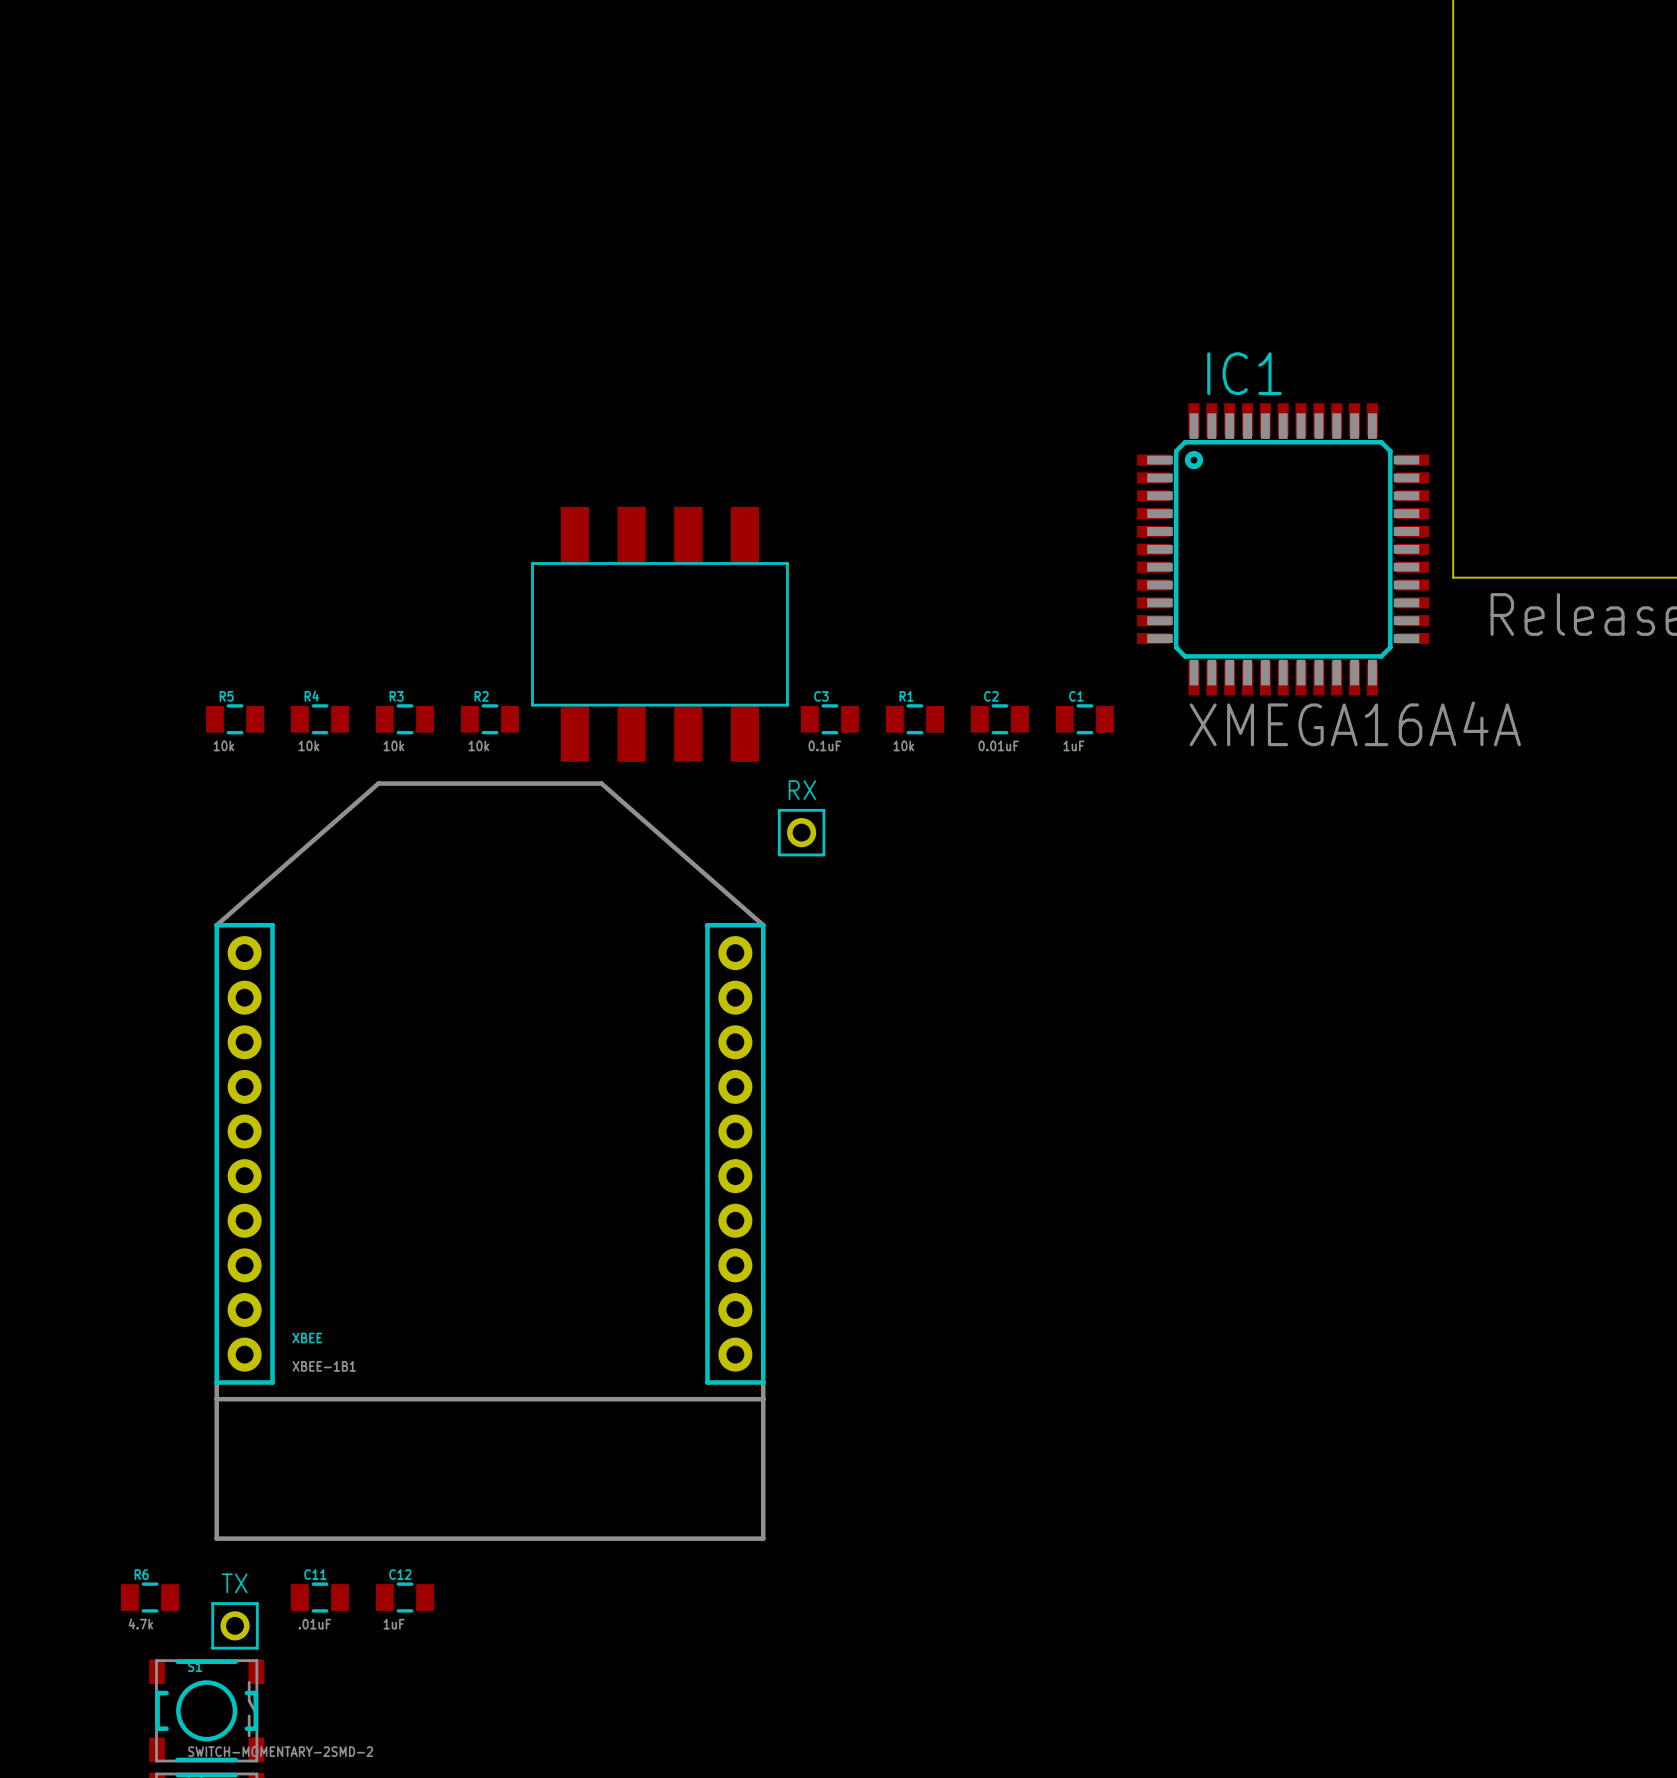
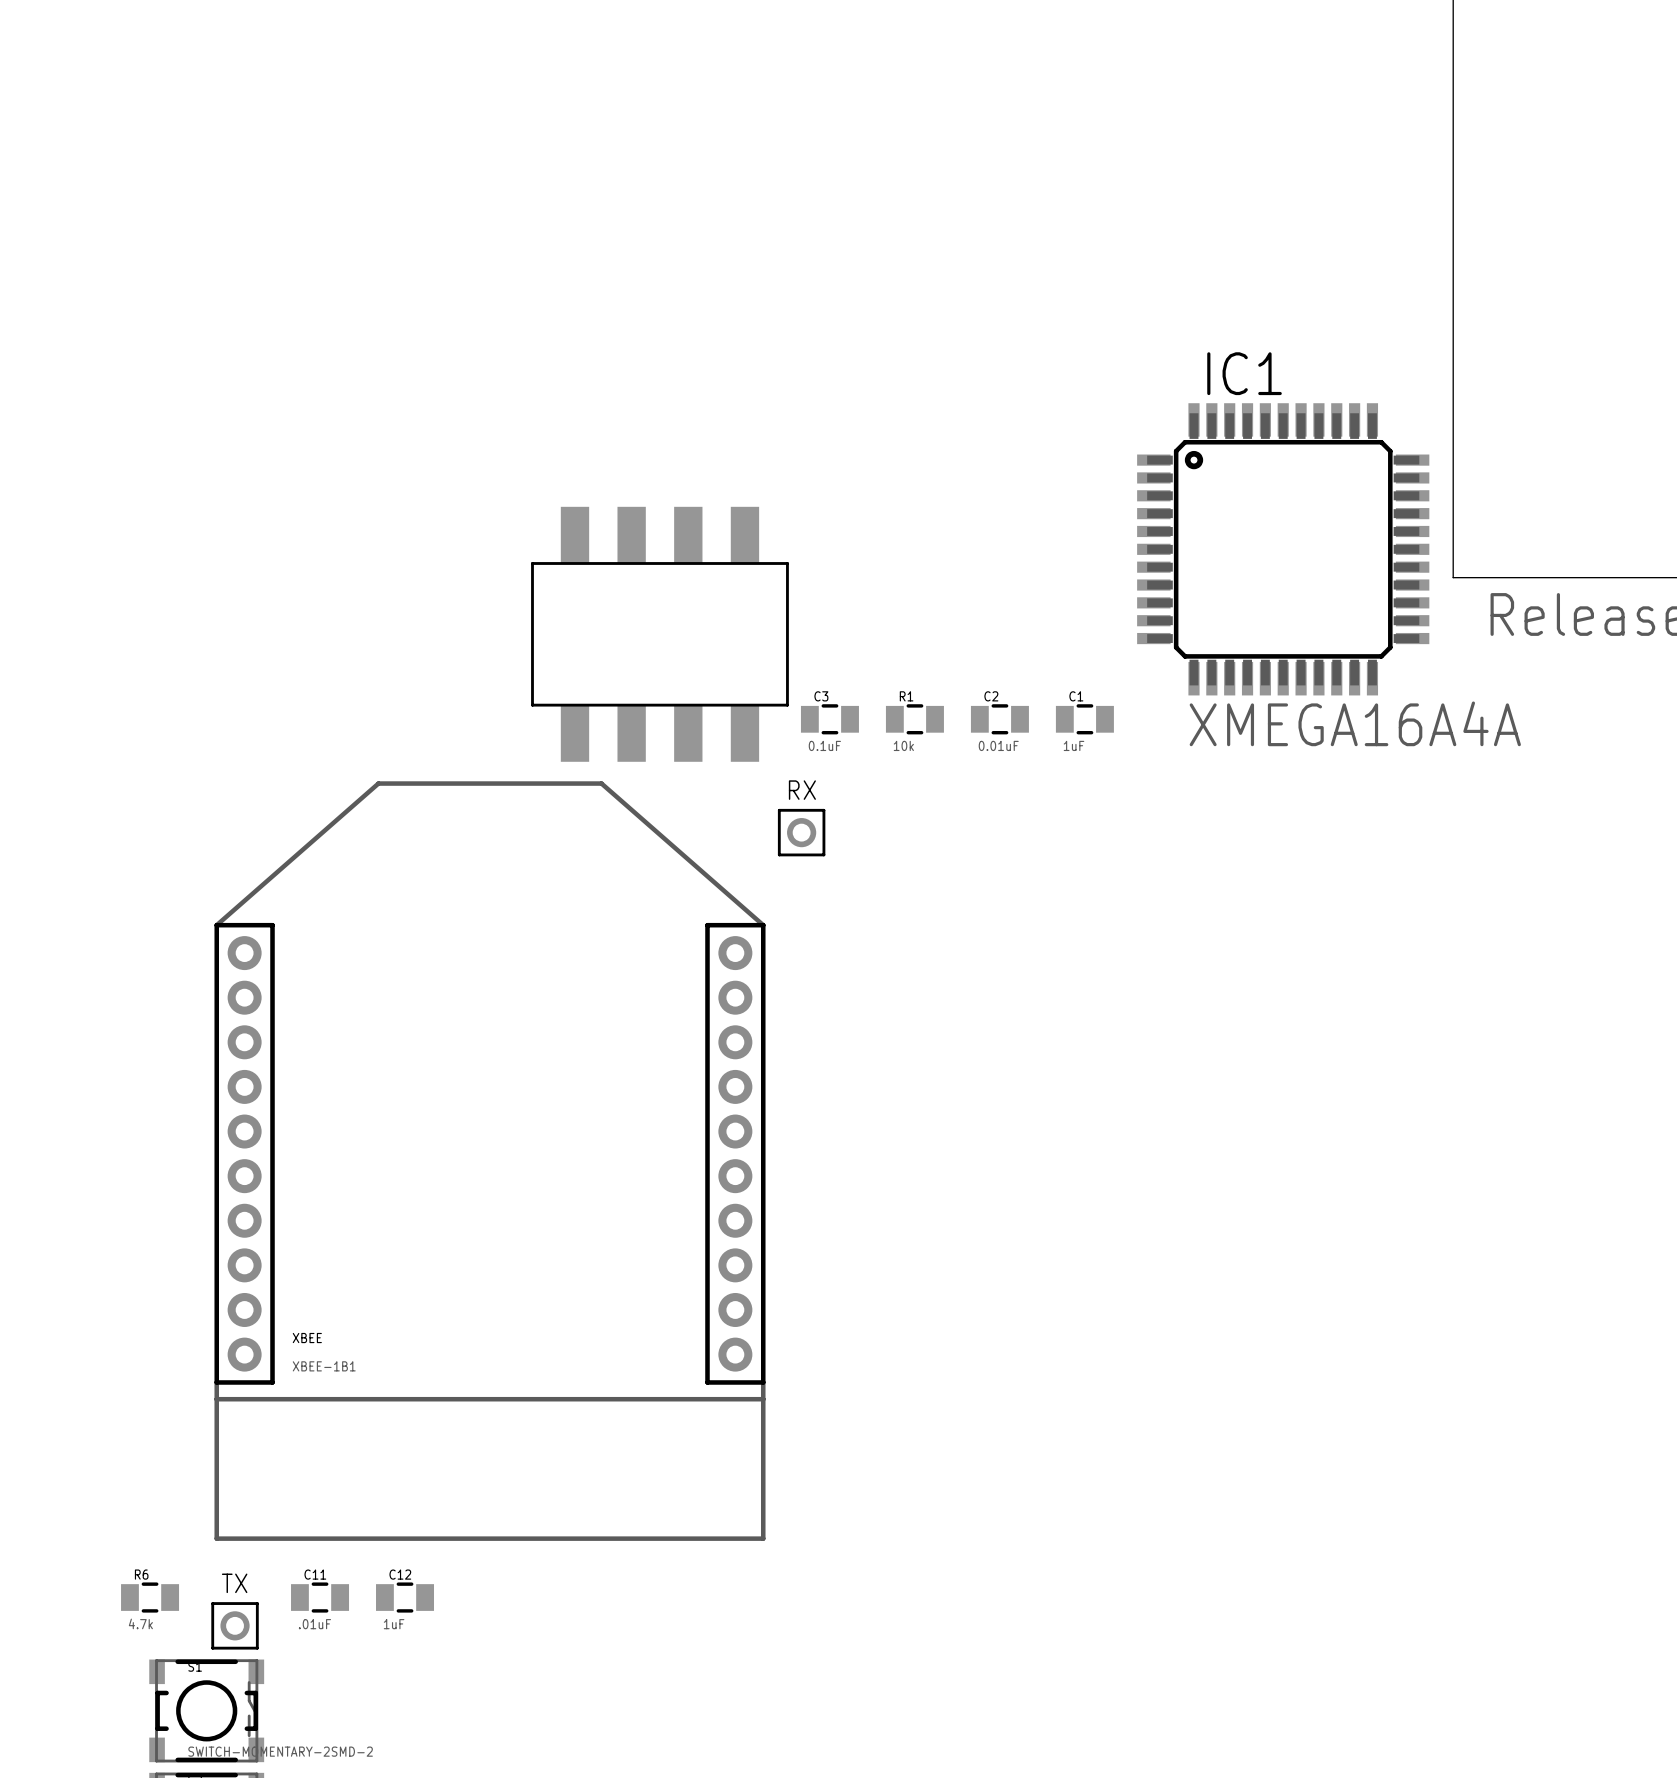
R5: 10k (235, 719) -> none
R4: 10k (320, 719) -> none
R3: 10k (405, 719) -> none
R2: 10k (489, 719) -> none

